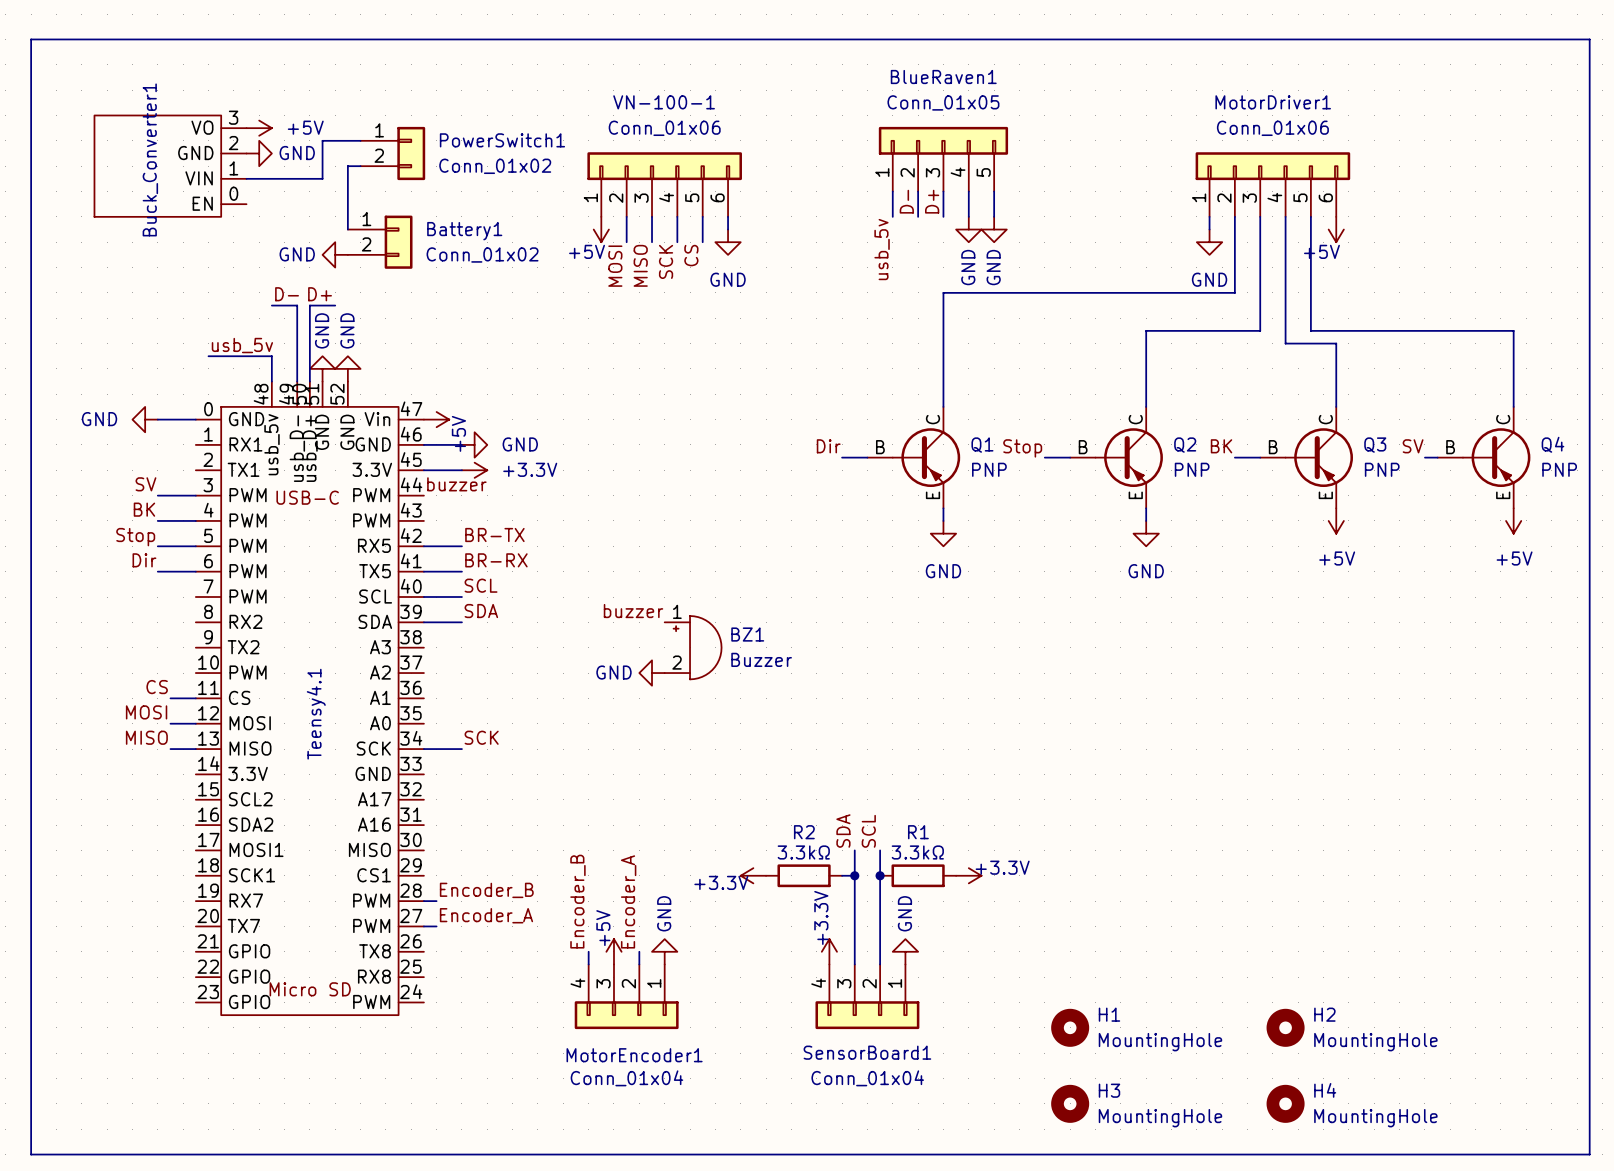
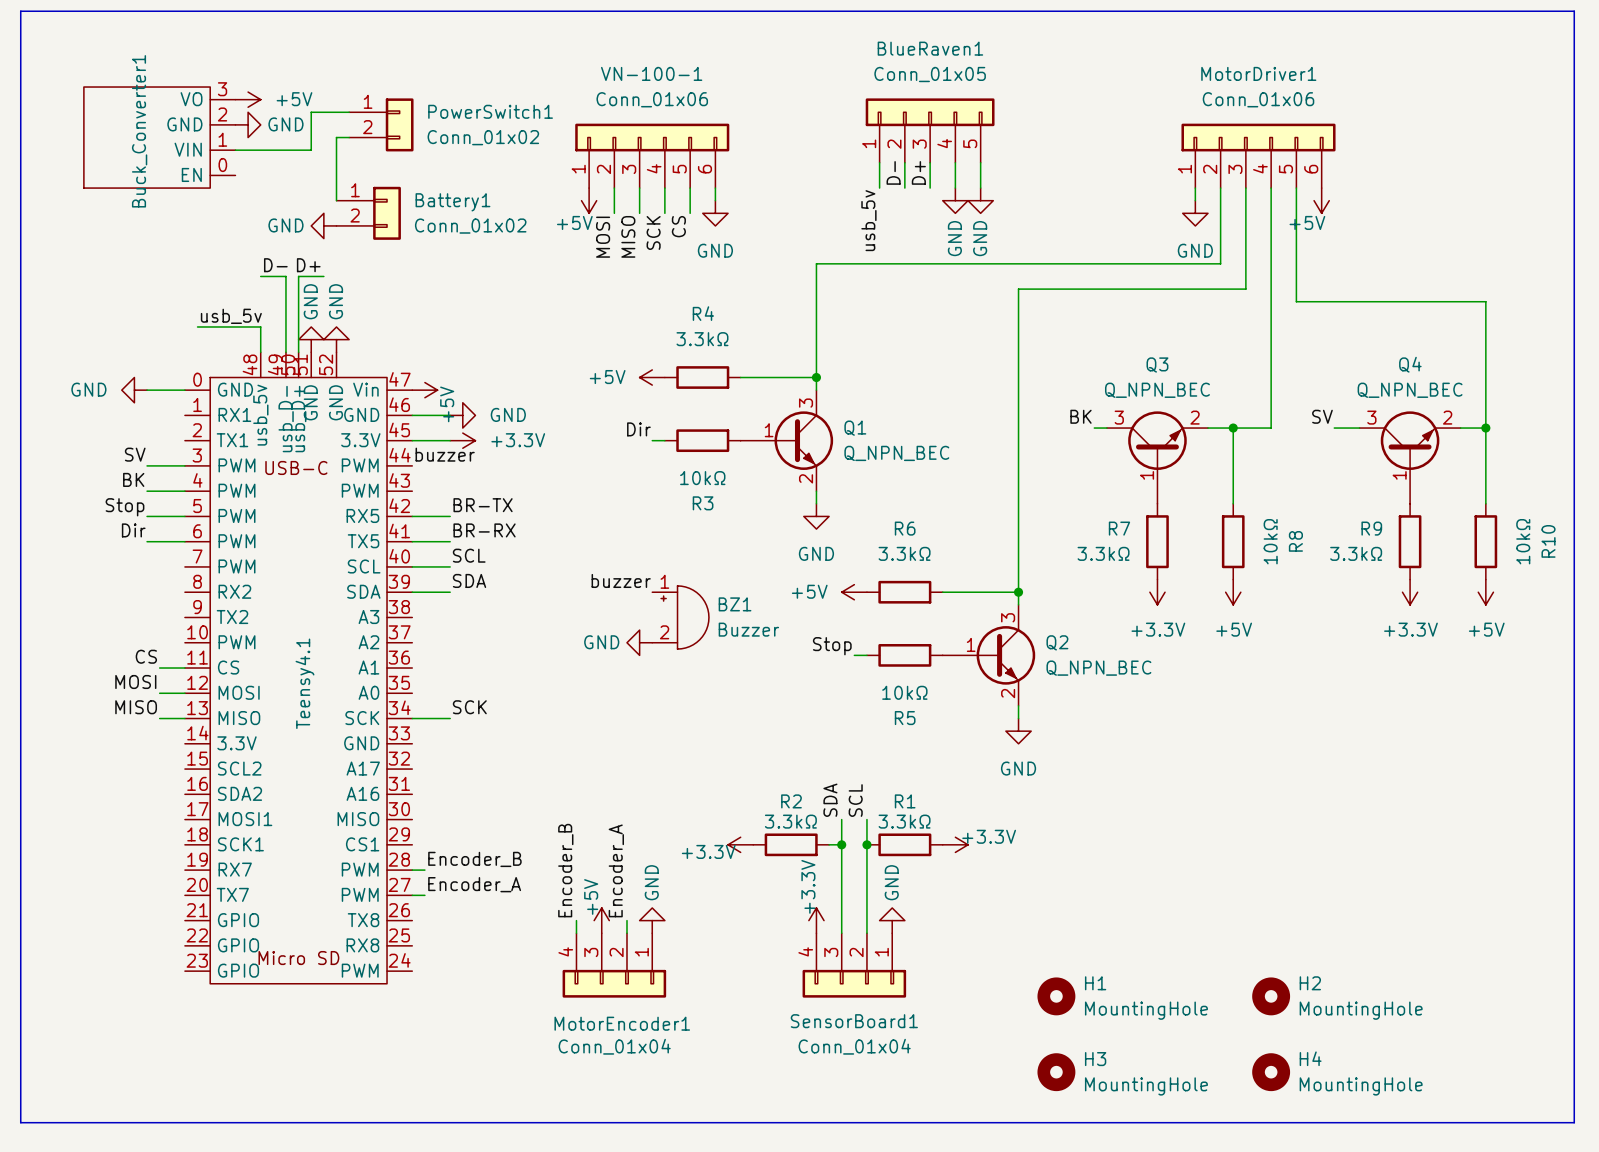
wire: (943, 292) (943, 406) -> (930, 263) (816, 263) (816, 390)
wire: (1260, 318) (1260, 330) (1146, 330) (1146, 406) -> (1245, 289) (1018, 289) (1018, 604)
wire: (1500, 330) (1513, 330) (1513, 406) -> (1485, 301) (1485, 503)
wire: (1285, 343) (1336, 343) (1336, 406) -> (1271, 314) (1271, 428) (1245, 428)
power symbol: none -> +5V (652, 377)
R4: none -> 3.3kΩ (702, 377)
wire: none -> (740, 377) (816, 377)
junction: none -> (816, 377)
Q1 symbol: [867, 406, 961, 509] -> [740, 390, 834, 492]
Q2 symbol: [1070, 406, 1163, 509] -> [942, 604, 1036, 706]
Q3 symbol: [1260, 406, 1353, 509] -> [1106, 411, 1208, 504]
Q4 symbol: [1437, 406, 1531, 509] -> [1359, 411, 1461, 504]
Q4 name position: Q4 (1552, 444) -> Q4 (1410, 364)
Q3 name position: Q3 (1375, 445) -> Q3 (1157, 365)
label position: Dir (828, 446) -> Dir (638, 429)
label position: BK (1221, 446) -> BK (1080, 416)
label position: SV (1413, 446) -> SV (1322, 416)
label: Stop (1022, 448) -> none
wire: (842, 457) (867, 457) -> none
wire: (1044, 457) (1070, 457) -> none
wire: none -> (1233, 428) (1233, 503)
junction: none -> (1233, 428)
wire: none -> (1334, 428) (1359, 428)
wire: (1424, 457) (1437, 457) -> (1207, 428) (1220, 428)
junction: none -> (1485, 428)
Q1 value: PNP (989, 469) -> Q_NPN_BEC (896, 453)
Q2 value: PNP (1192, 469) -> Q_NPN_BEC (1098, 668)
Q3 value: PNP (1382, 469) -> Q_NPN_BEC (1157, 390)
Q4 value: PNP (1559, 469) -> Q_NPN_BEC (1410, 390)
wire: none -> (652, 440) (664, 440)
R3: none -> 10kΩ (702, 440)
wire: (943, 508) (943, 520) -> (816, 491) (816, 503)
wire: (1146, 508) (1146, 520) -> none
power symbol: +5V (1336, 520) -> none
power symbol: +5V (1513, 520) -> none
power symbol position: GND (943, 533) -> GND (816, 516)
power symbol: GND (1146, 533) -> none
R7: none -> 3.3kΩ (1157, 541)
R8: none -> 10kΩ (1233, 541)
R9: none -> 3.3kΩ (1410, 541)
R10: none -> 10kΩ (1485, 541)
power symbol: none -> +5V (854, 592)
R6: none -> 3.3kΩ (904, 592)
wire: none -> (942, 592) (1018, 592)
junction: none -> (1018, 592)
power symbol: none -> +3.3V (1157, 592)
power symbol: none -> +5V (1233, 592)
power symbol: none -> +3.3V (1410, 592)
power symbol: none -> +5V (1485, 592)
label: none -> Stop (832, 646)
wire: none -> (854, 655) (866, 655)
R5: none -> 10kΩ (904, 655)
wire: none -> (1018, 705) (1018, 718)
power symbol: none -> GND (1018, 731)

